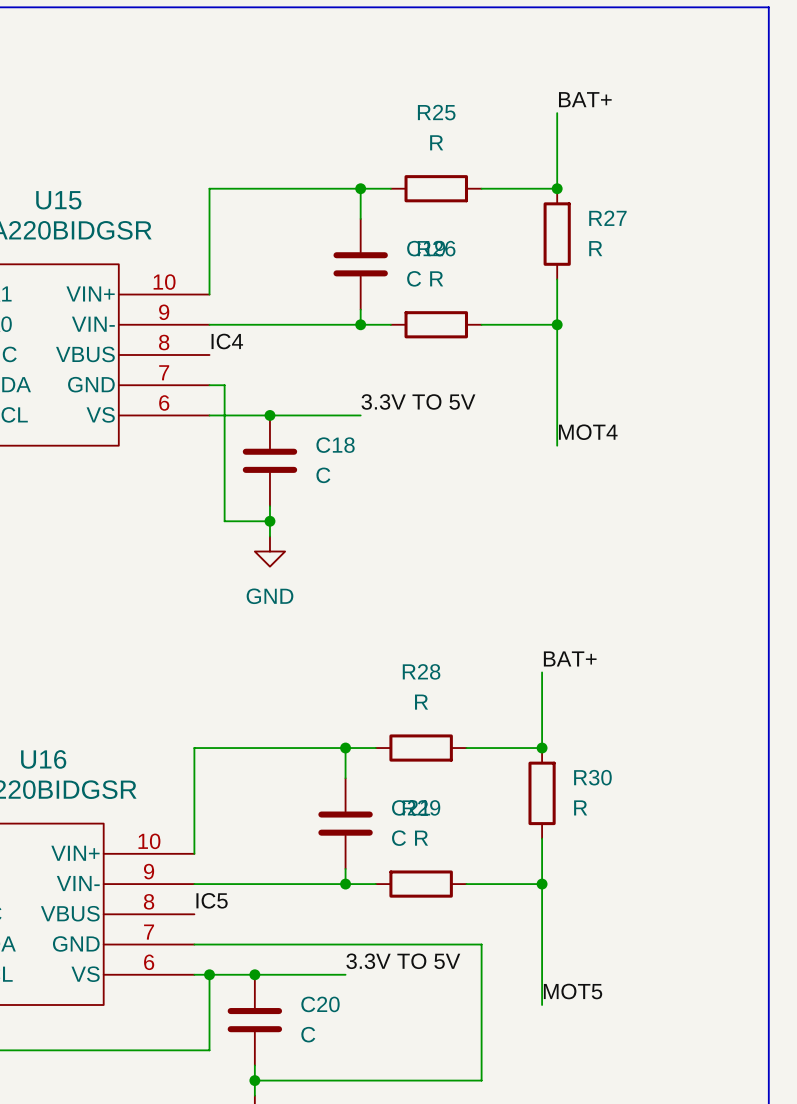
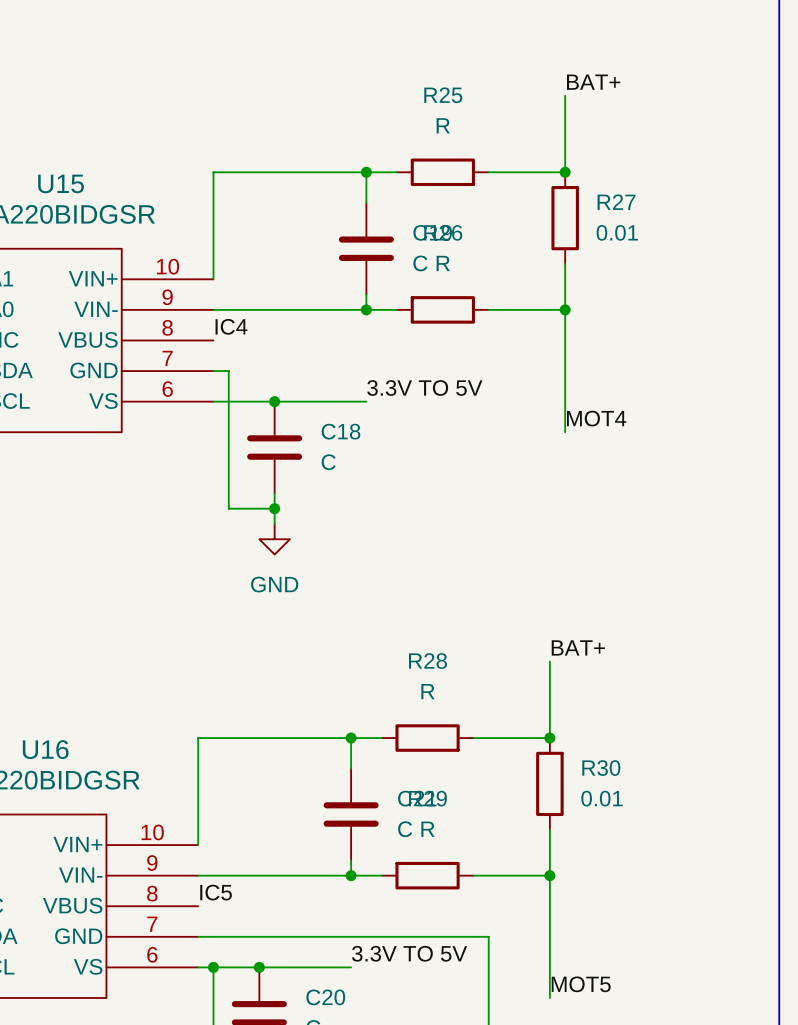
R27 value: R (595, 248) -> 0.01 (617, 232)
R30 value: R (580, 807) -> 0.01 (601, 798)

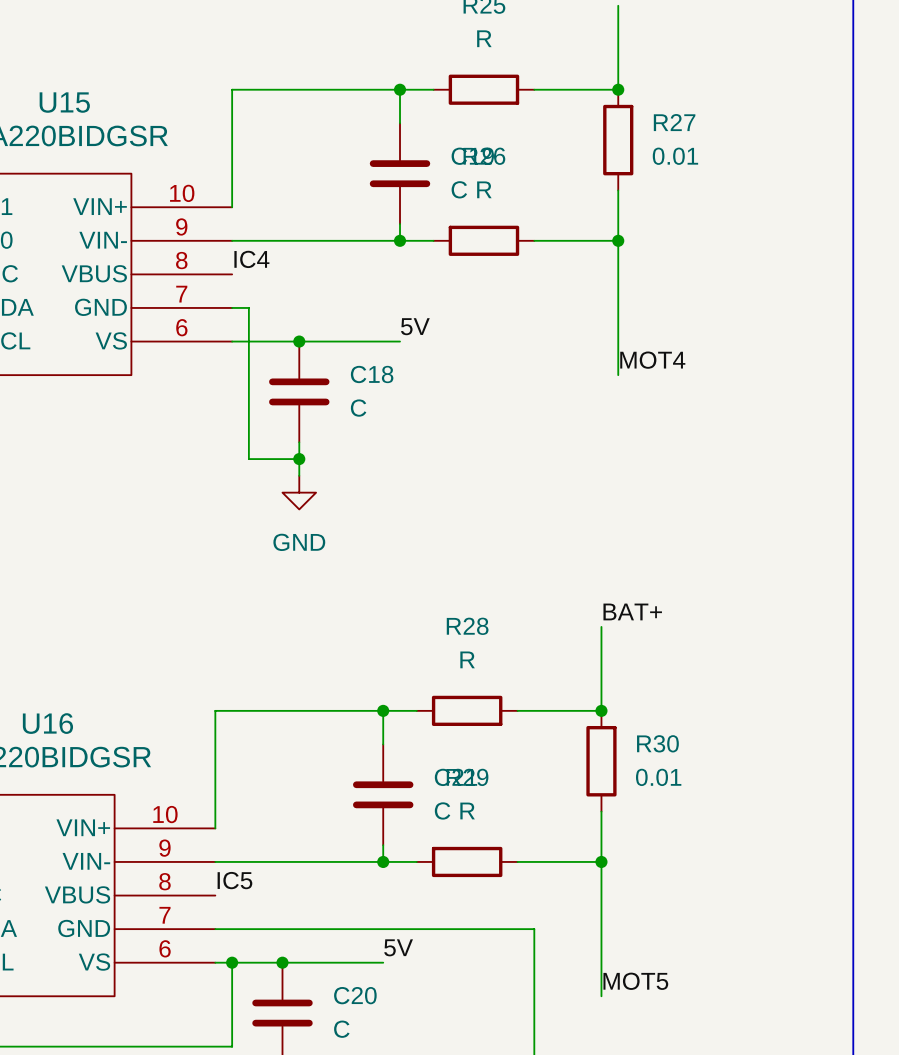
label: 3.3V TO 5V (424, 387) -> 5V (415, 326)
label: 3.3V TO 5V (409, 953) -> 5V (398, 947)

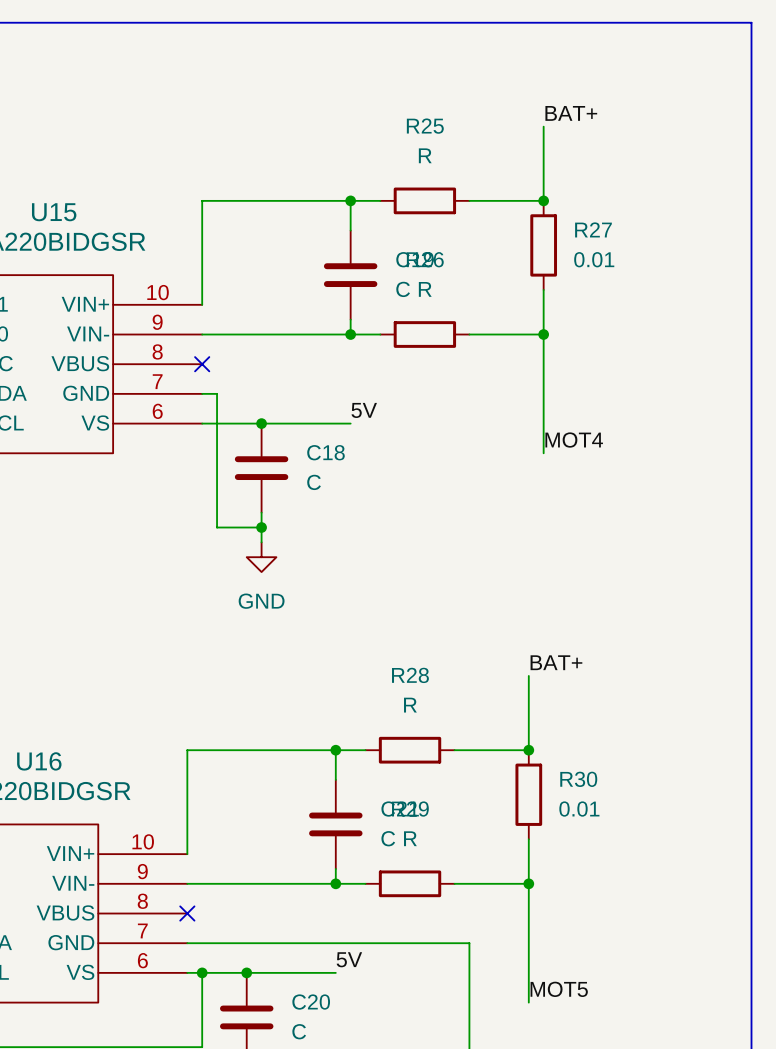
label: IC4 (251, 259) -> none
no-connect mark: none -> (202, 364)
label: IC5 (234, 880) -> none
no-connect mark: none -> (187, 913)

